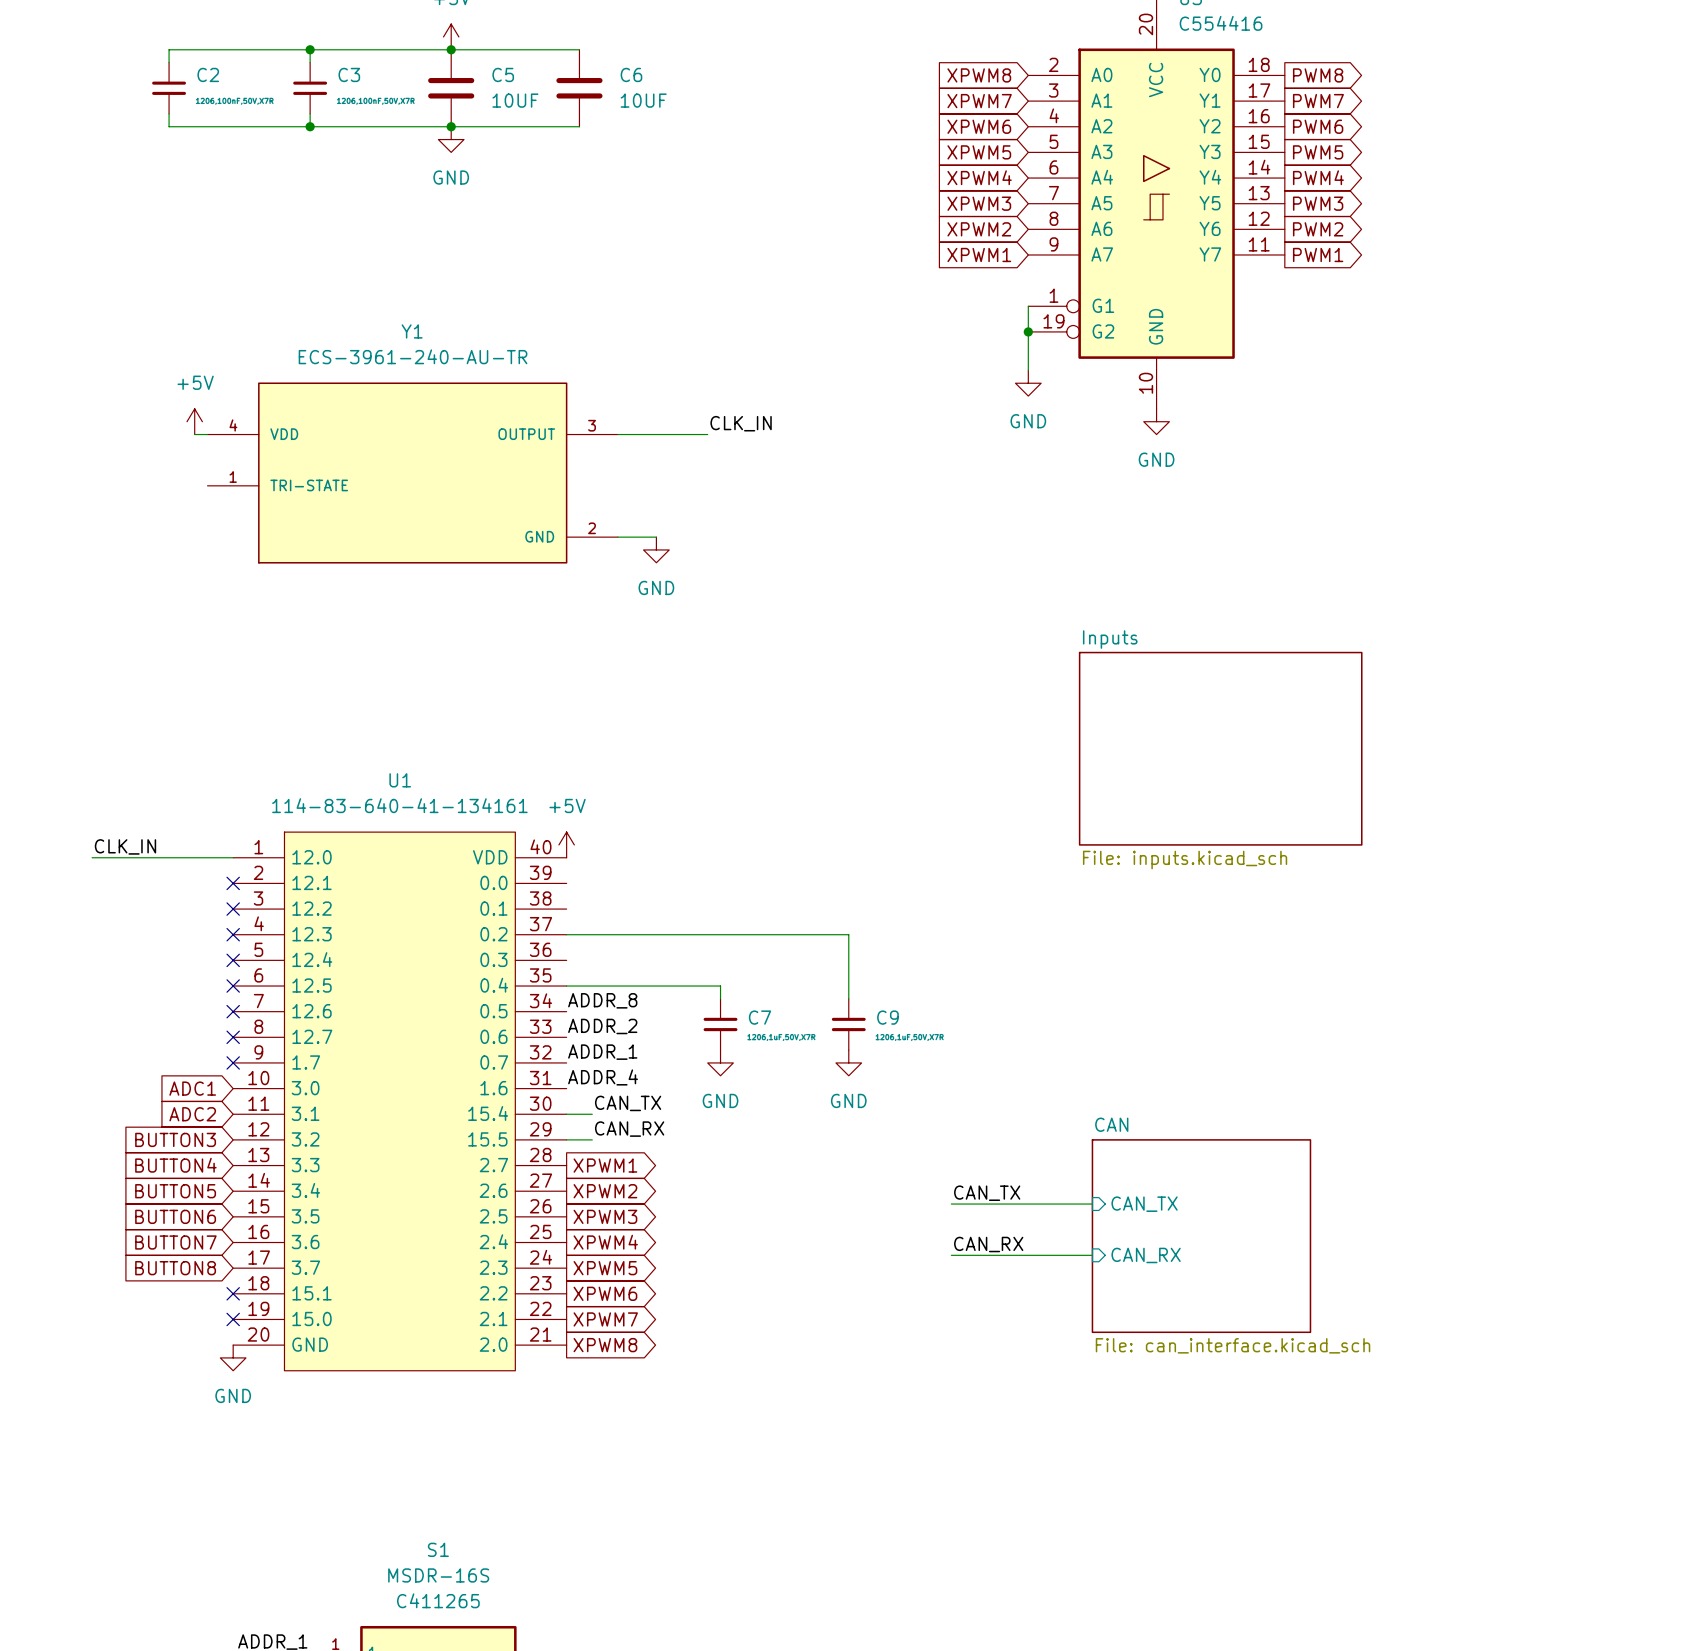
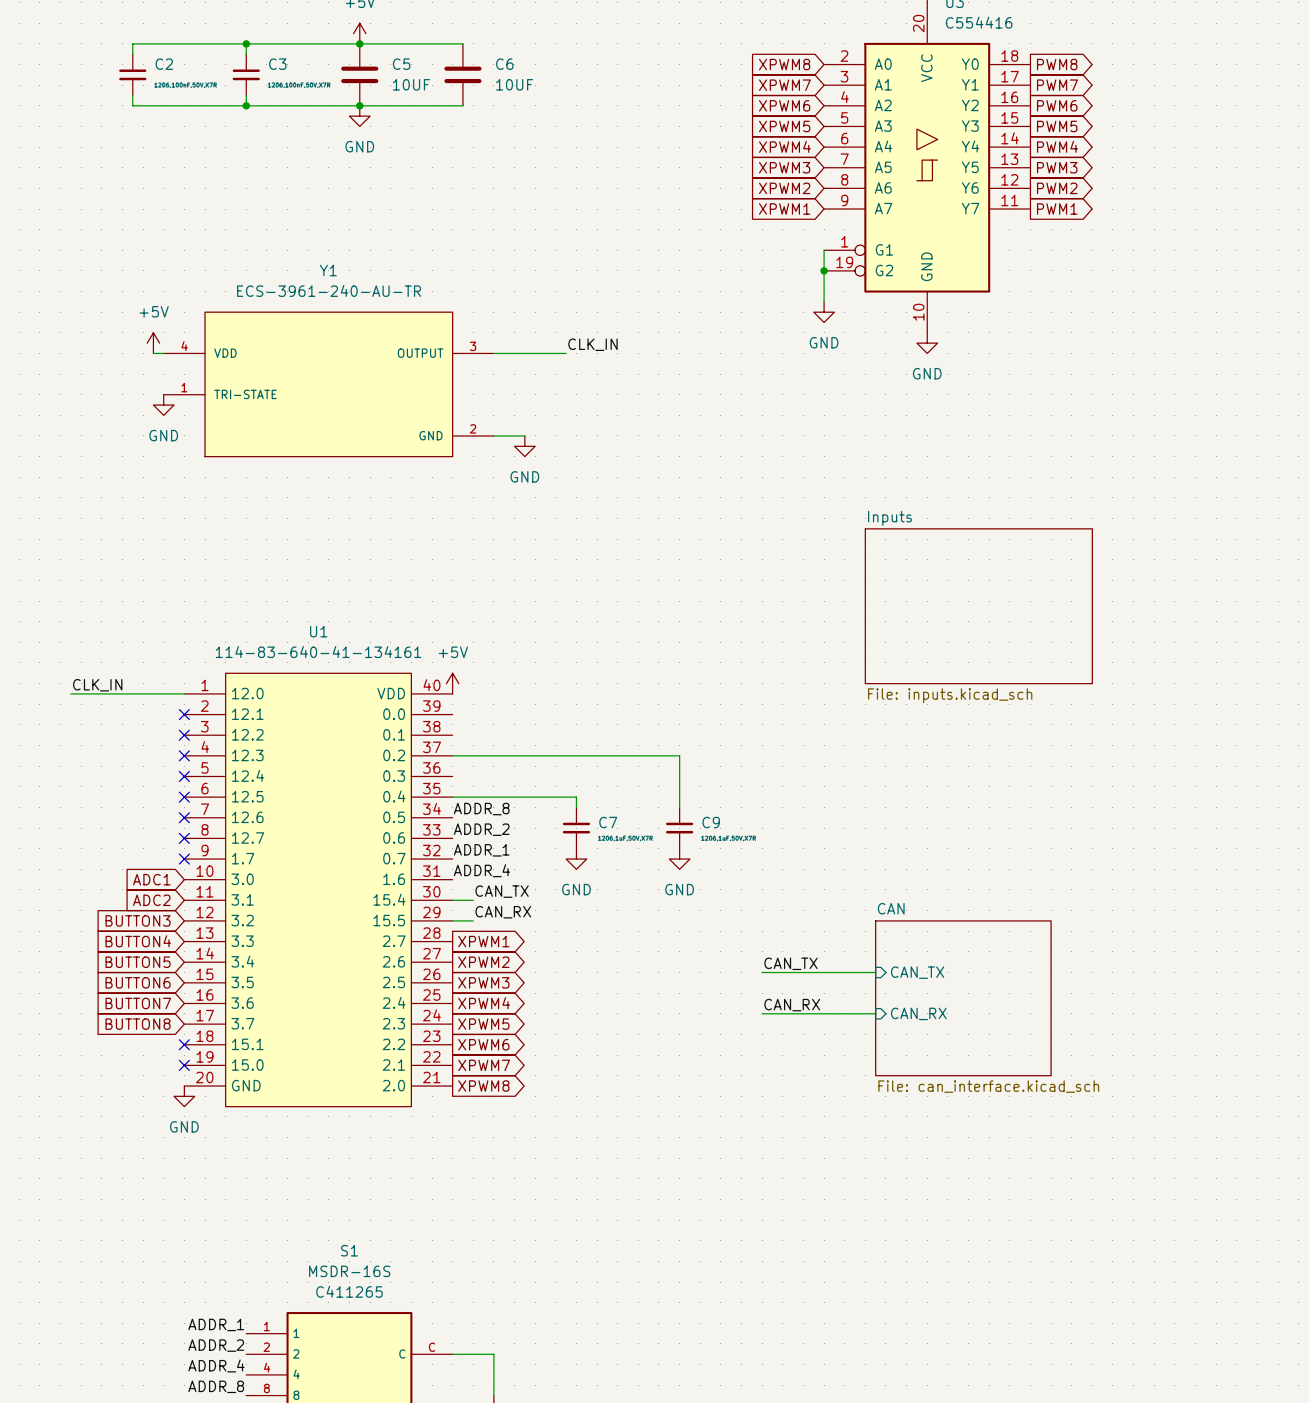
power symbol: none -> GND (163, 405)

